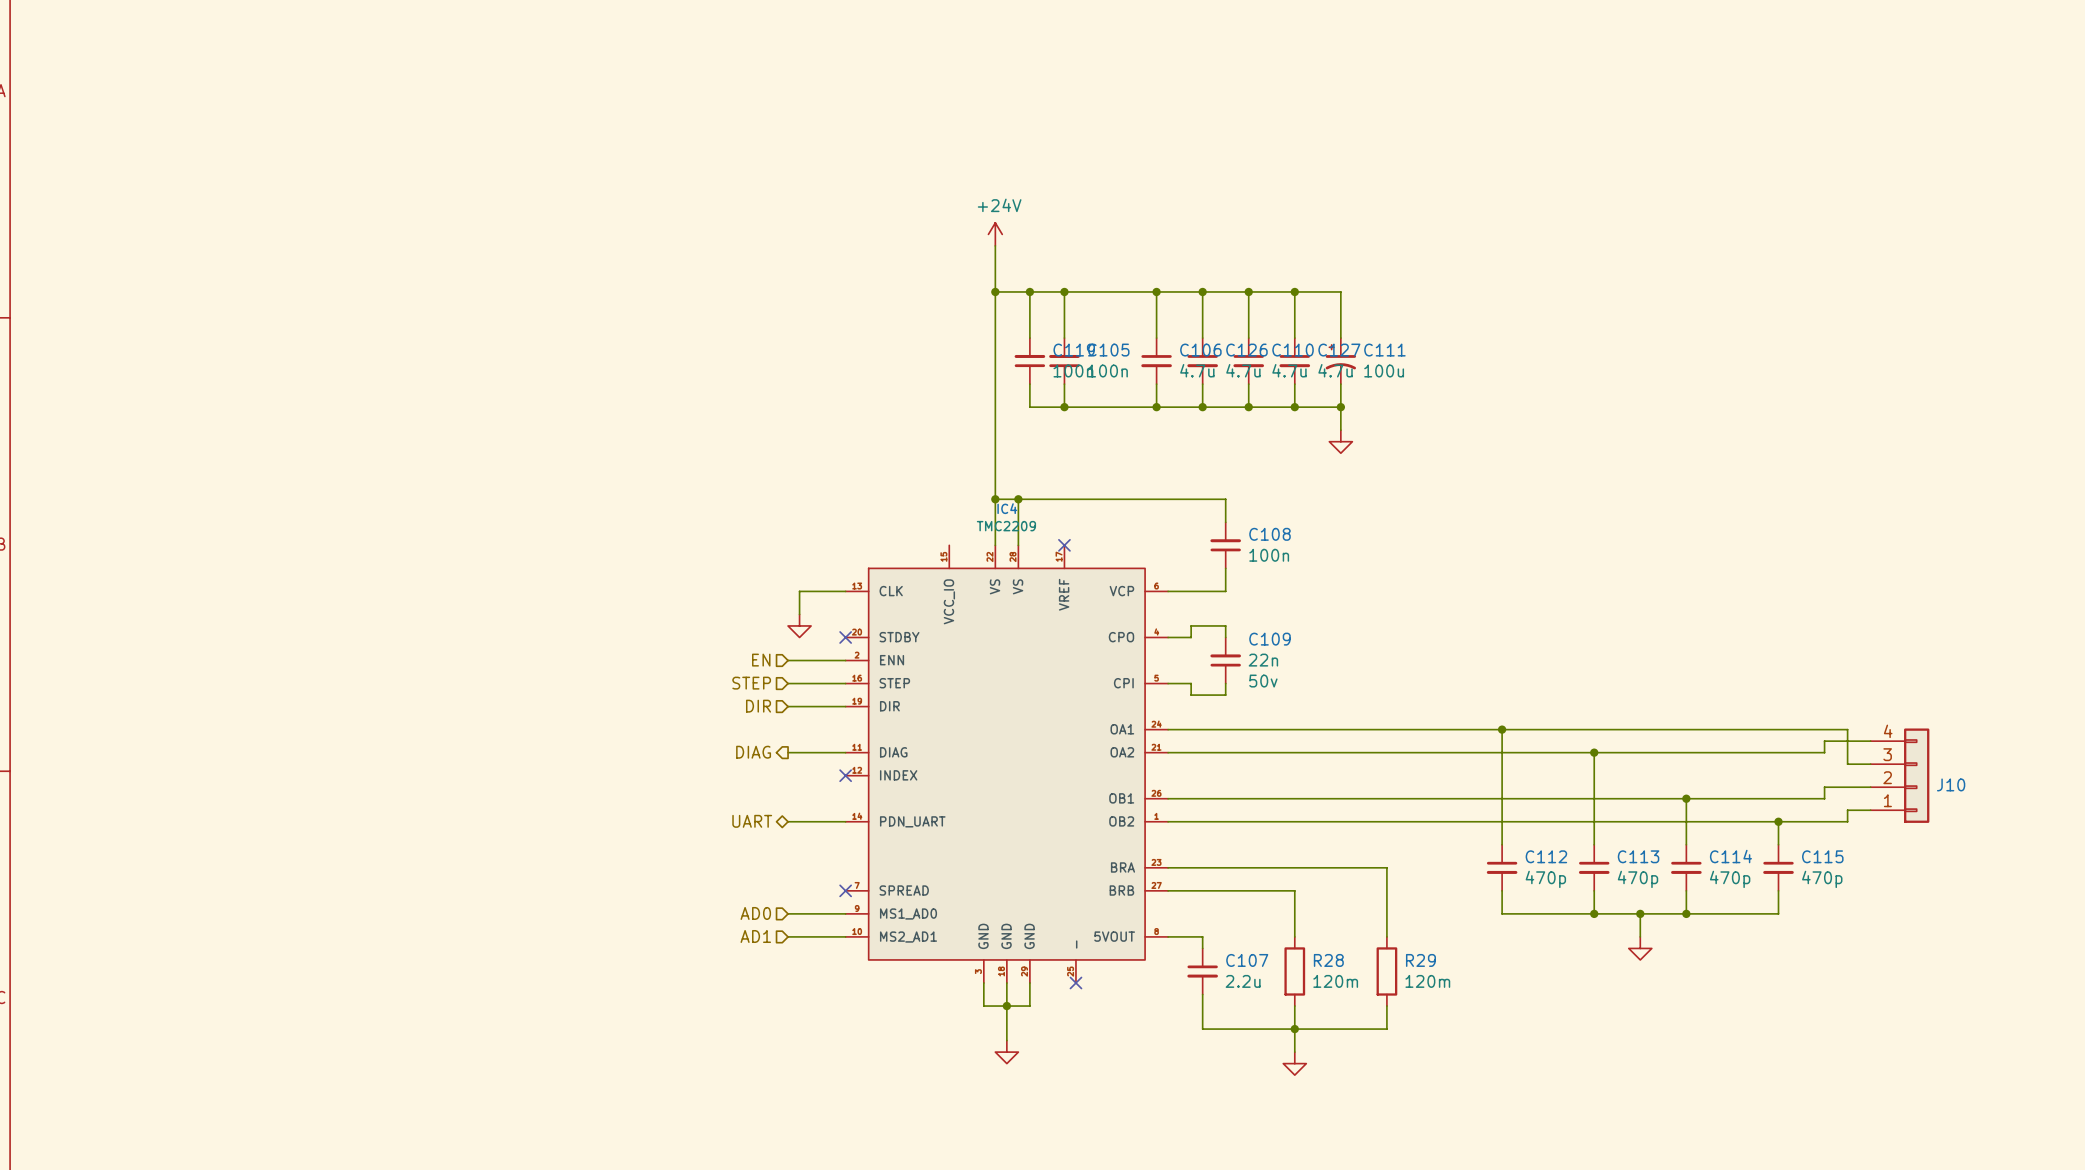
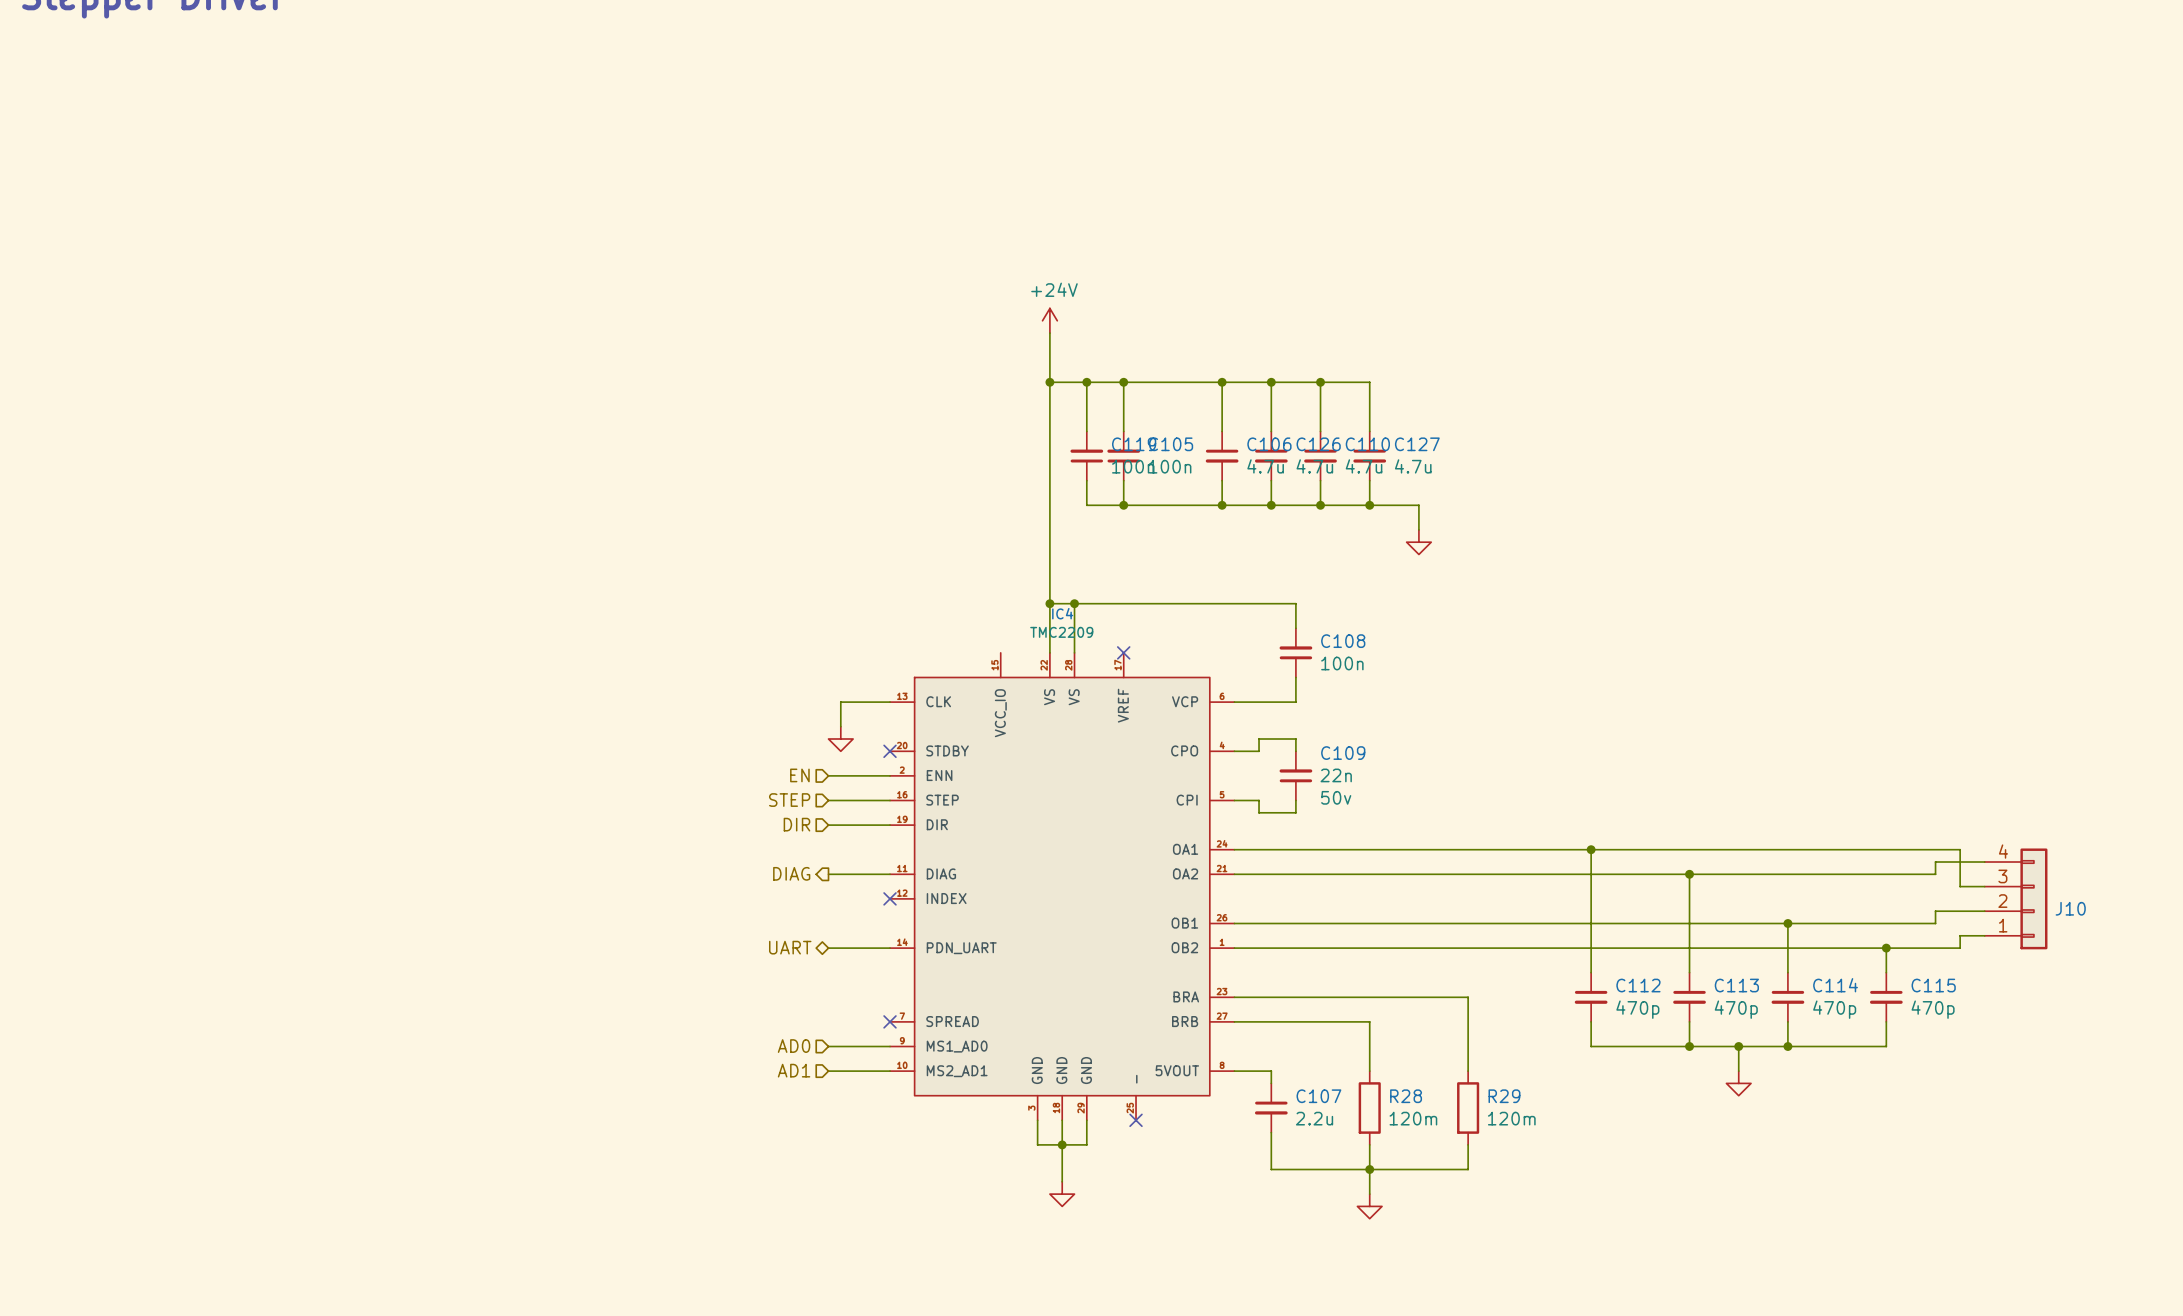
wire: (1294, 291) (1340, 291) (1340, 338) -> none
junction: (1294, 291) -> none
C111: 100u (1340, 361) -> none
wire: (1340, 384) (1340, 407) -> none
junction: (1340, 407) -> none

